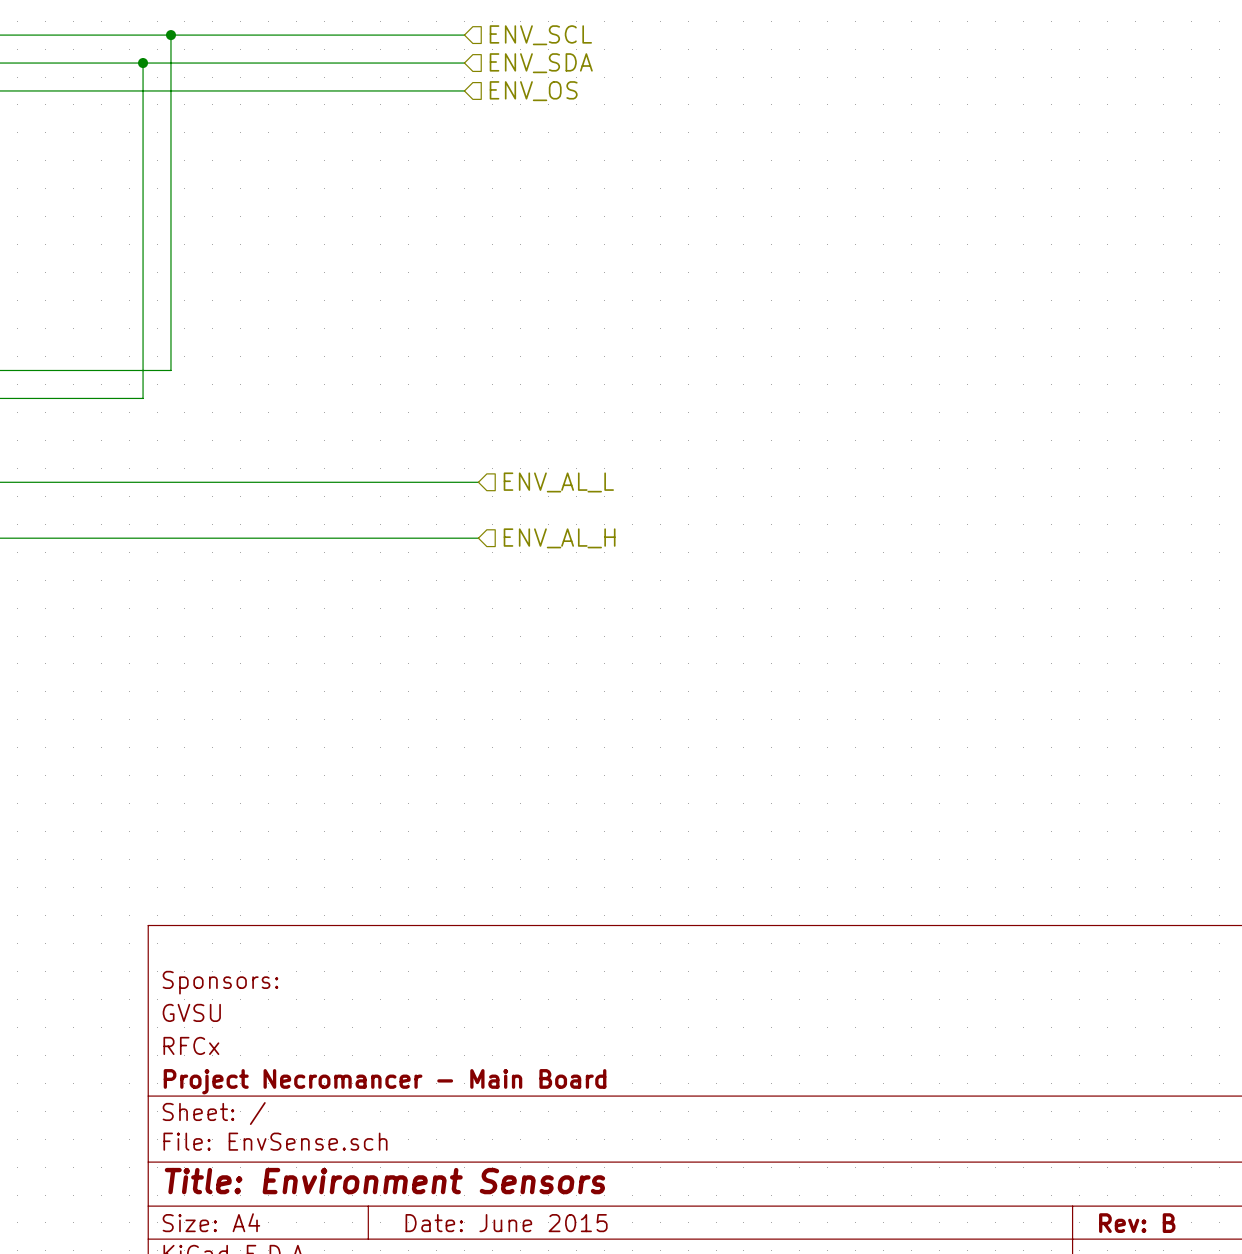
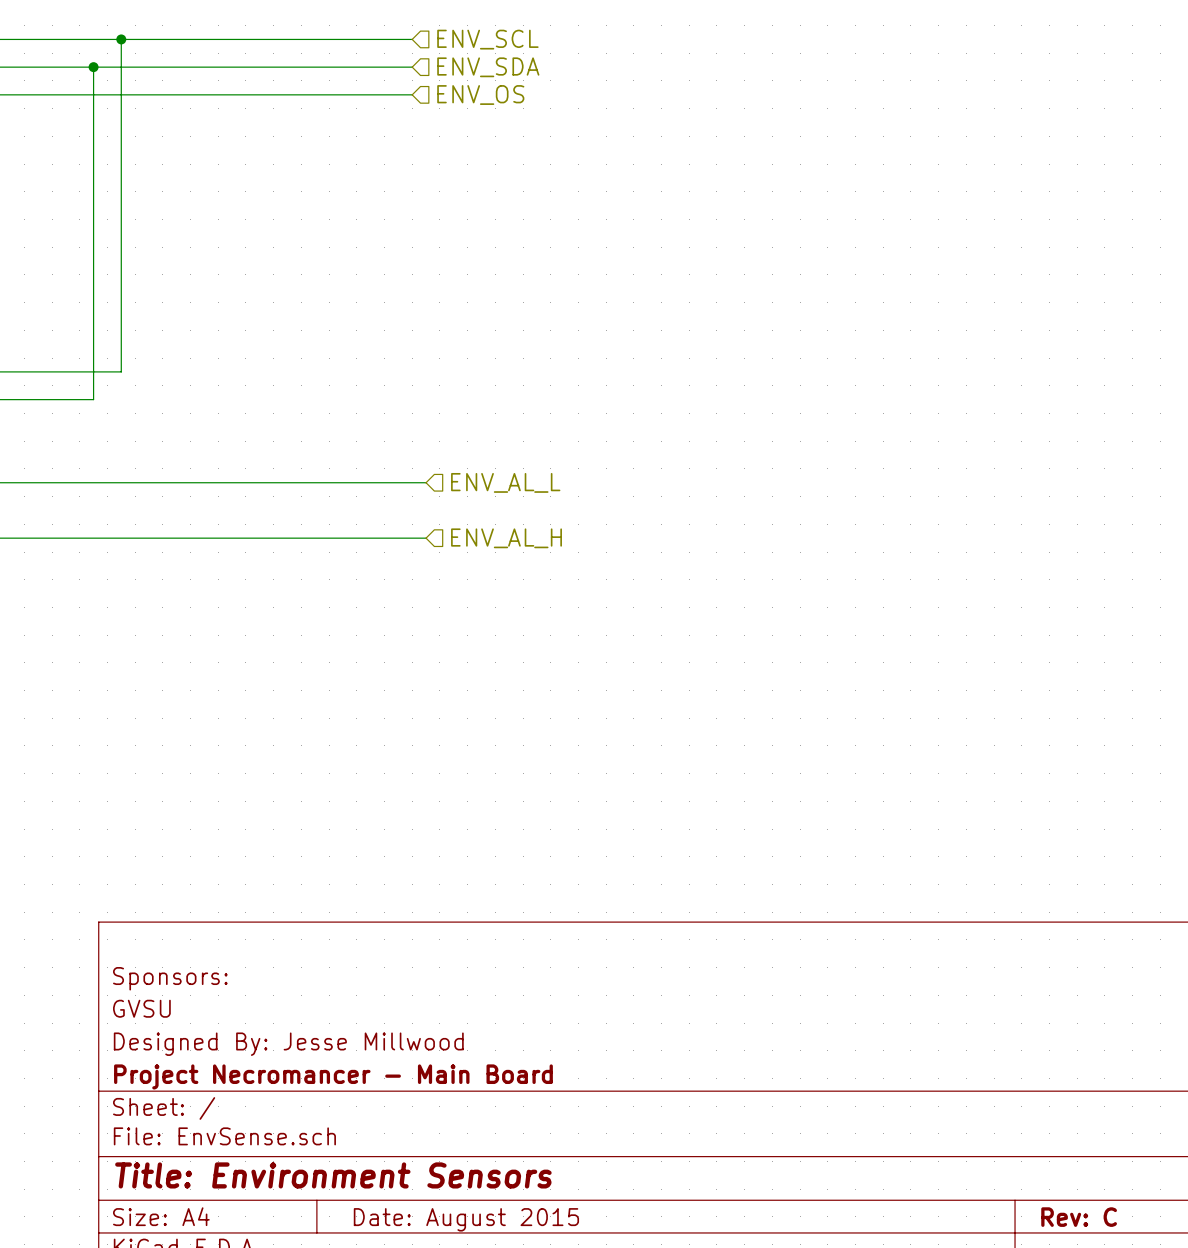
title block: RFCx (191, 1045) -> Designed By: Jesse Millwood (288, 1044)
title block: Date: June 2015 (506, 1223) -> Date: August 2015 (466, 1219)
title block: Rev: B (1137, 1223) -> Rev: C (1079, 1217)

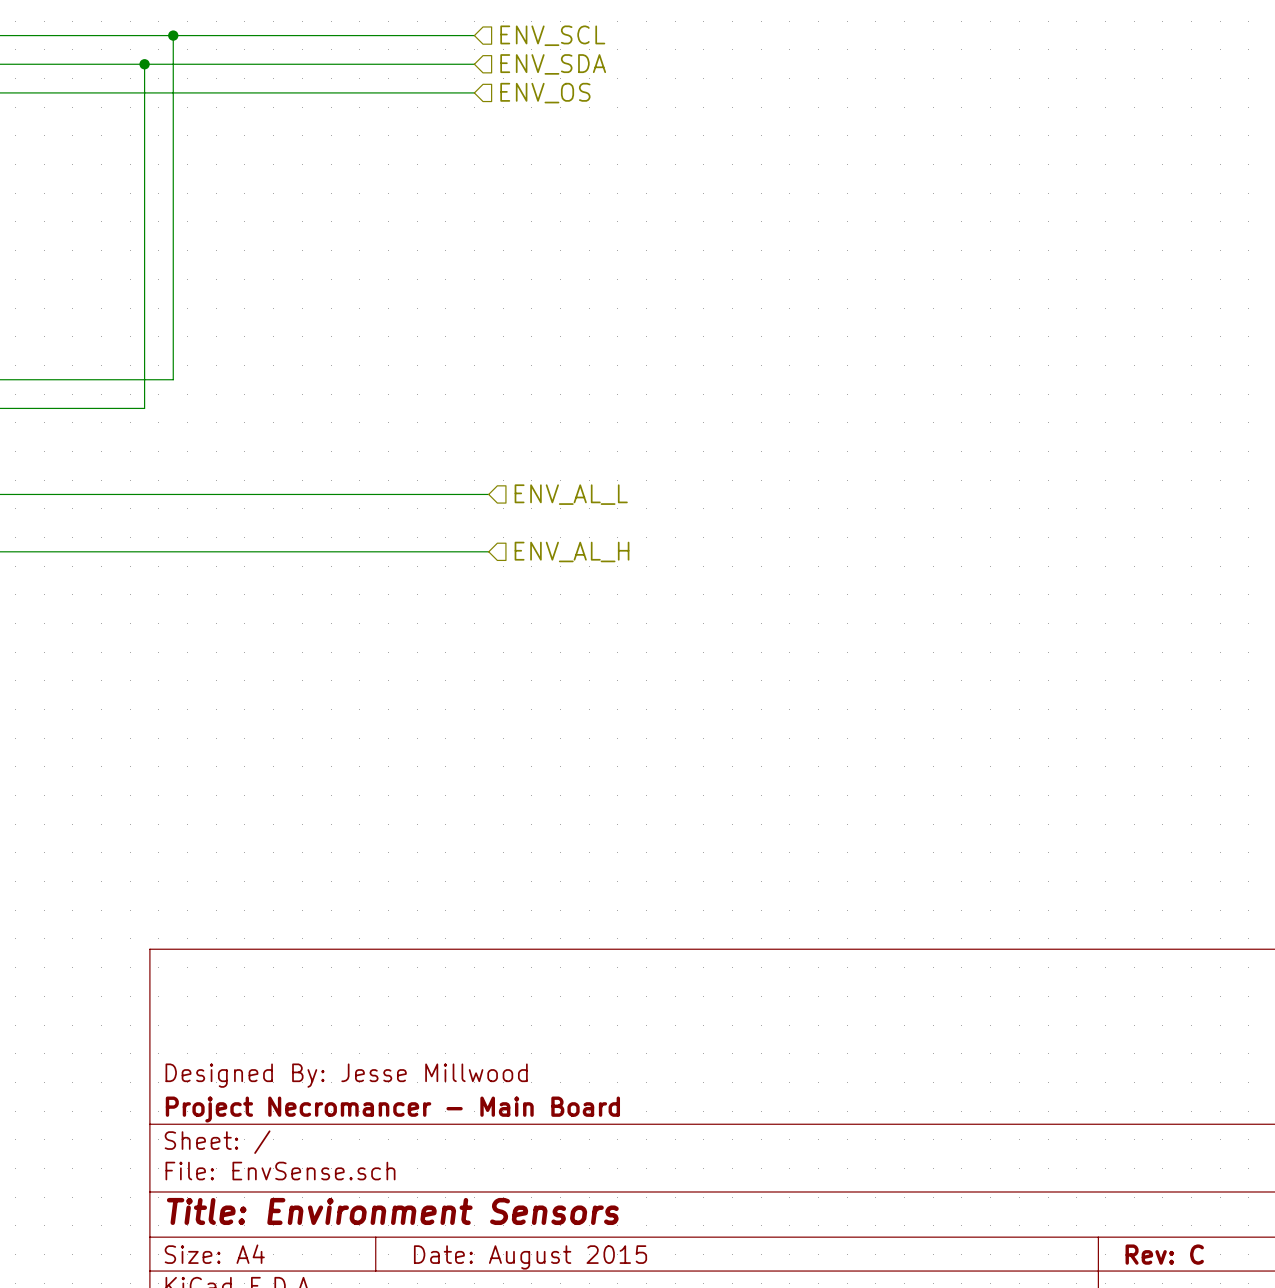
title block: Sponsors: (170, 978) -> none
title block: GVSU (141, 1008) -> none

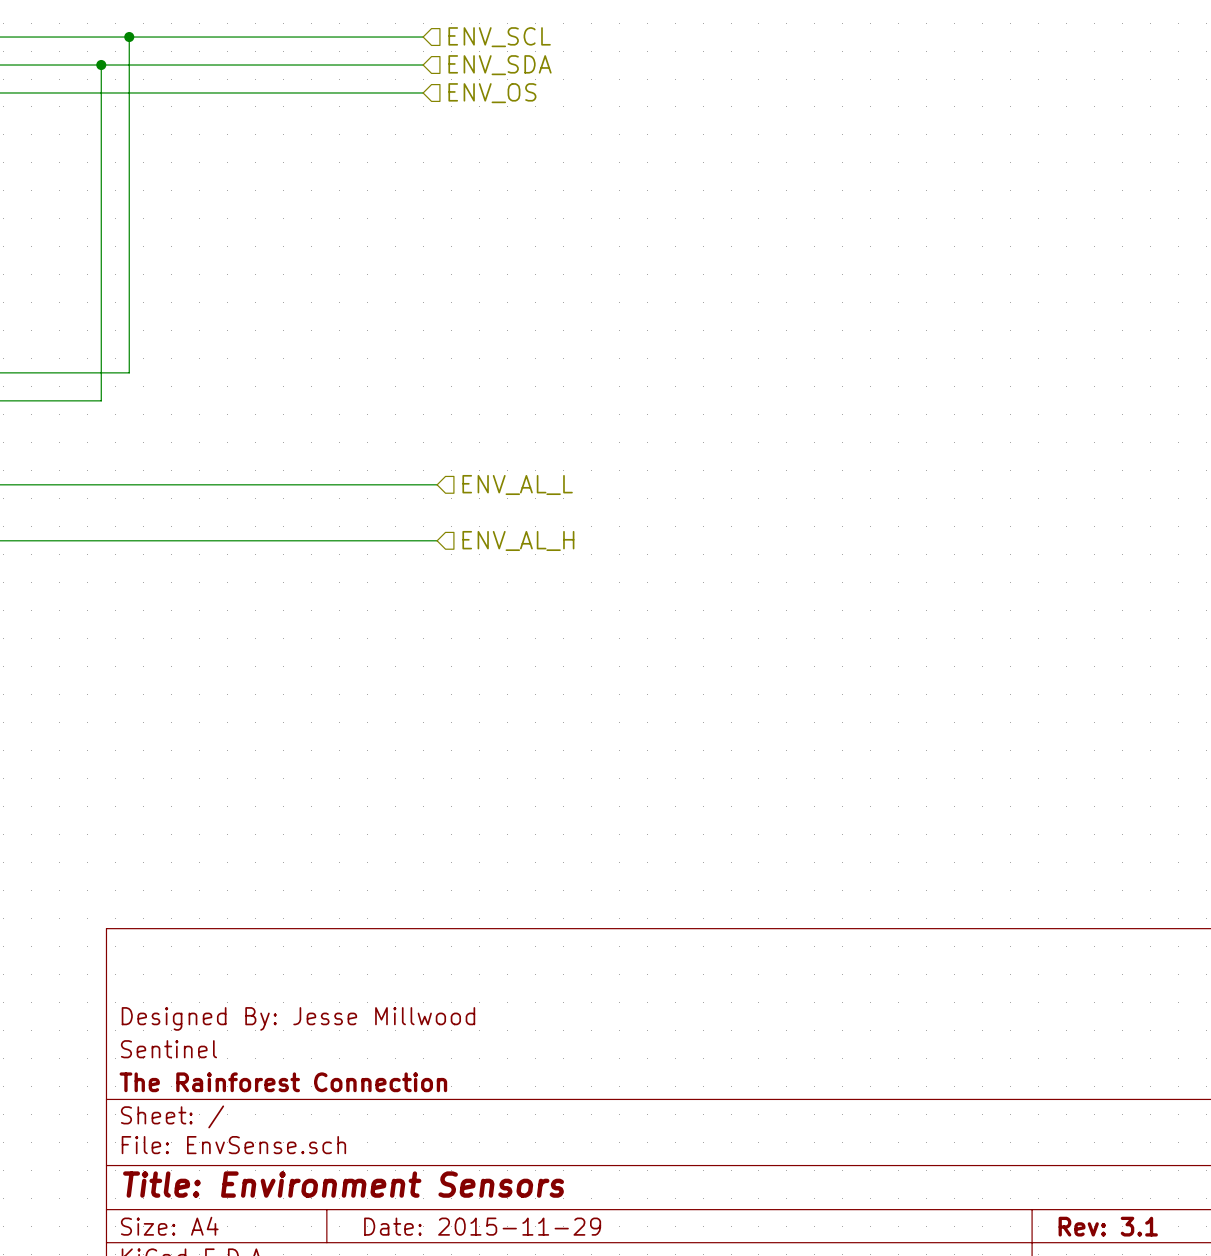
title block: none -> Designed By: Jesse Millwood (298, 1018)
title block: Designed By: Jesse Millwood (346, 1075) -> Sentinel (168, 1049)
title block: Project Necromancer - Main Board (392, 1109) -> The Rainforest Connection (283, 1082)
title block: Rev: C (1164, 1254) -> Rev: 3.1 (1108, 1226)
title block: Date: August 2015 (530, 1257) -> Date: 2015-11-29 (482, 1226)

